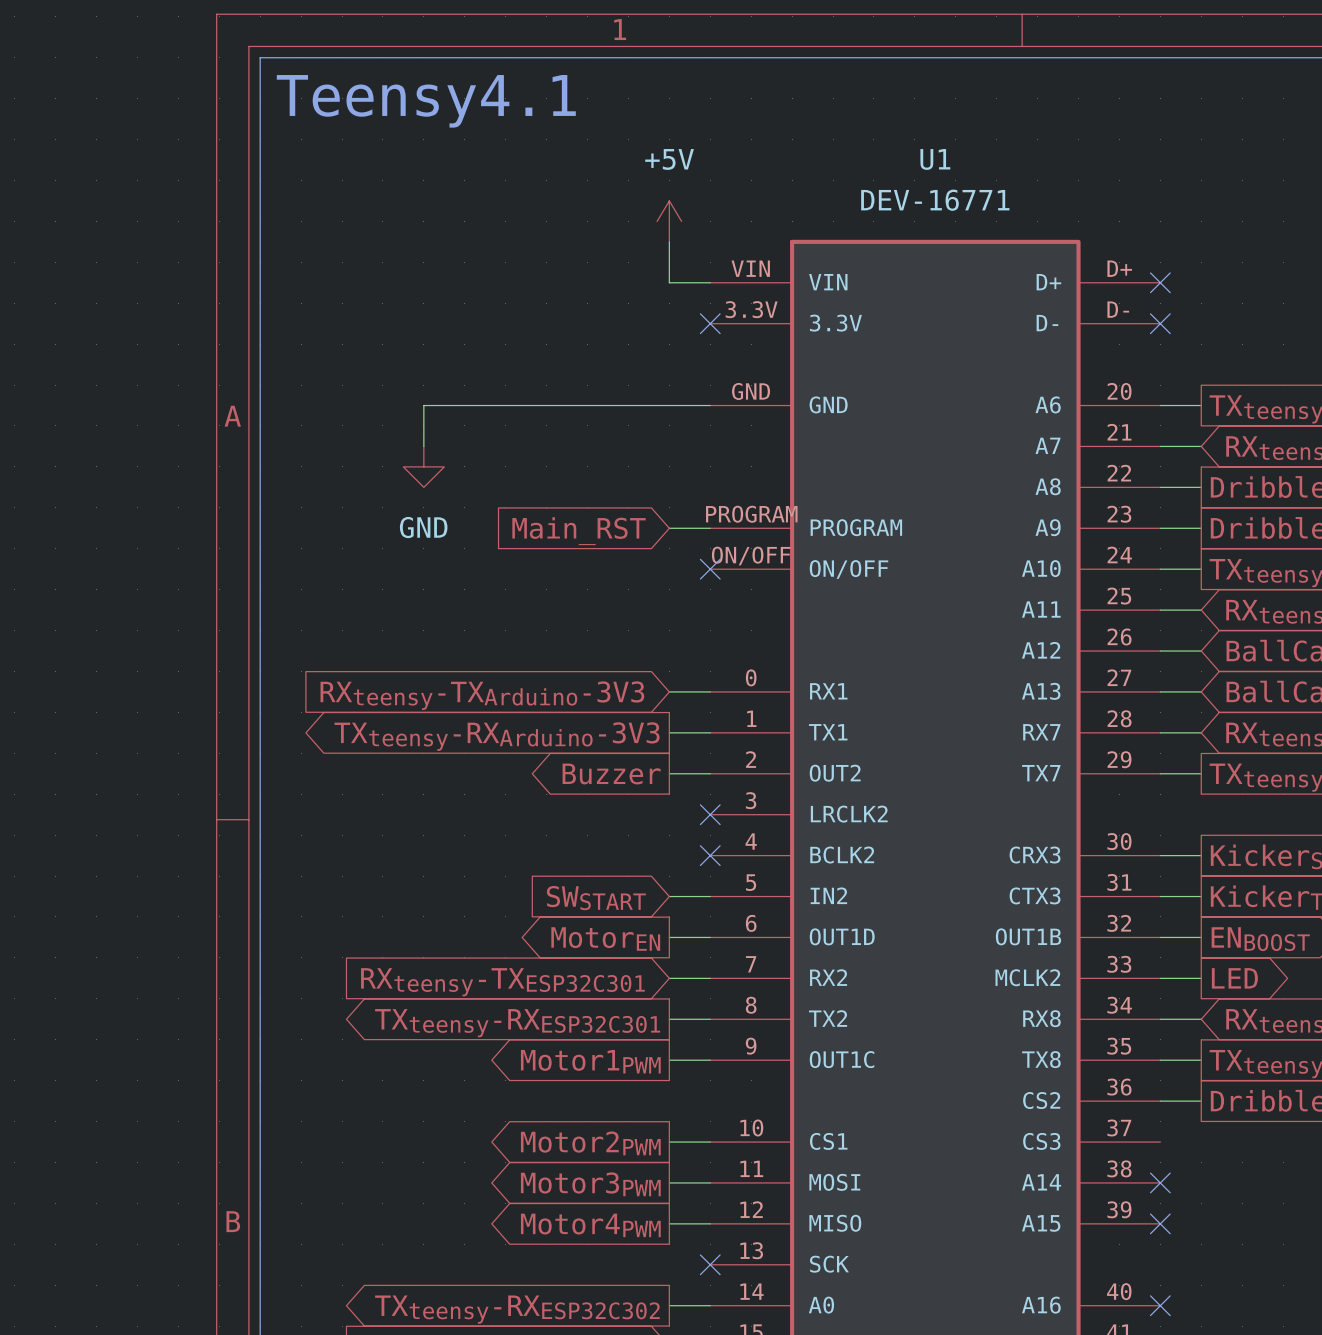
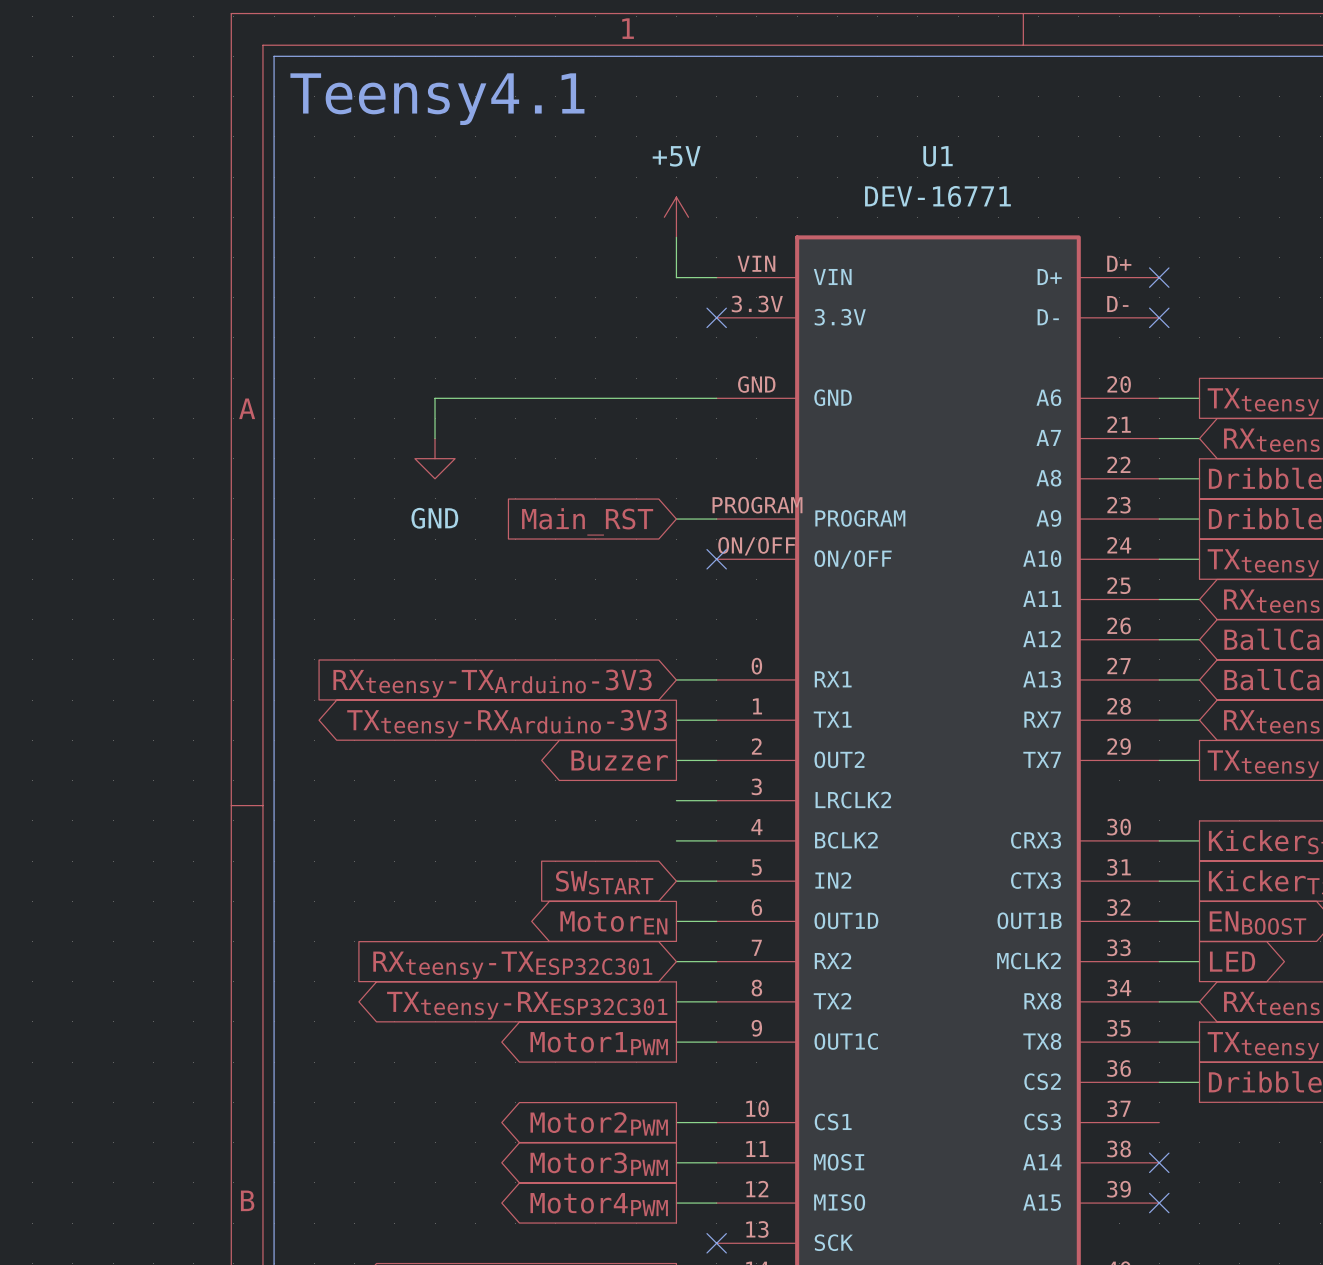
wire: none -> (676, 800) (716, 800)
no-connect mark: (710, 814) -> none
wire: none -> (676, 840) (716, 840)
no-connect mark: (710, 855) -> none

